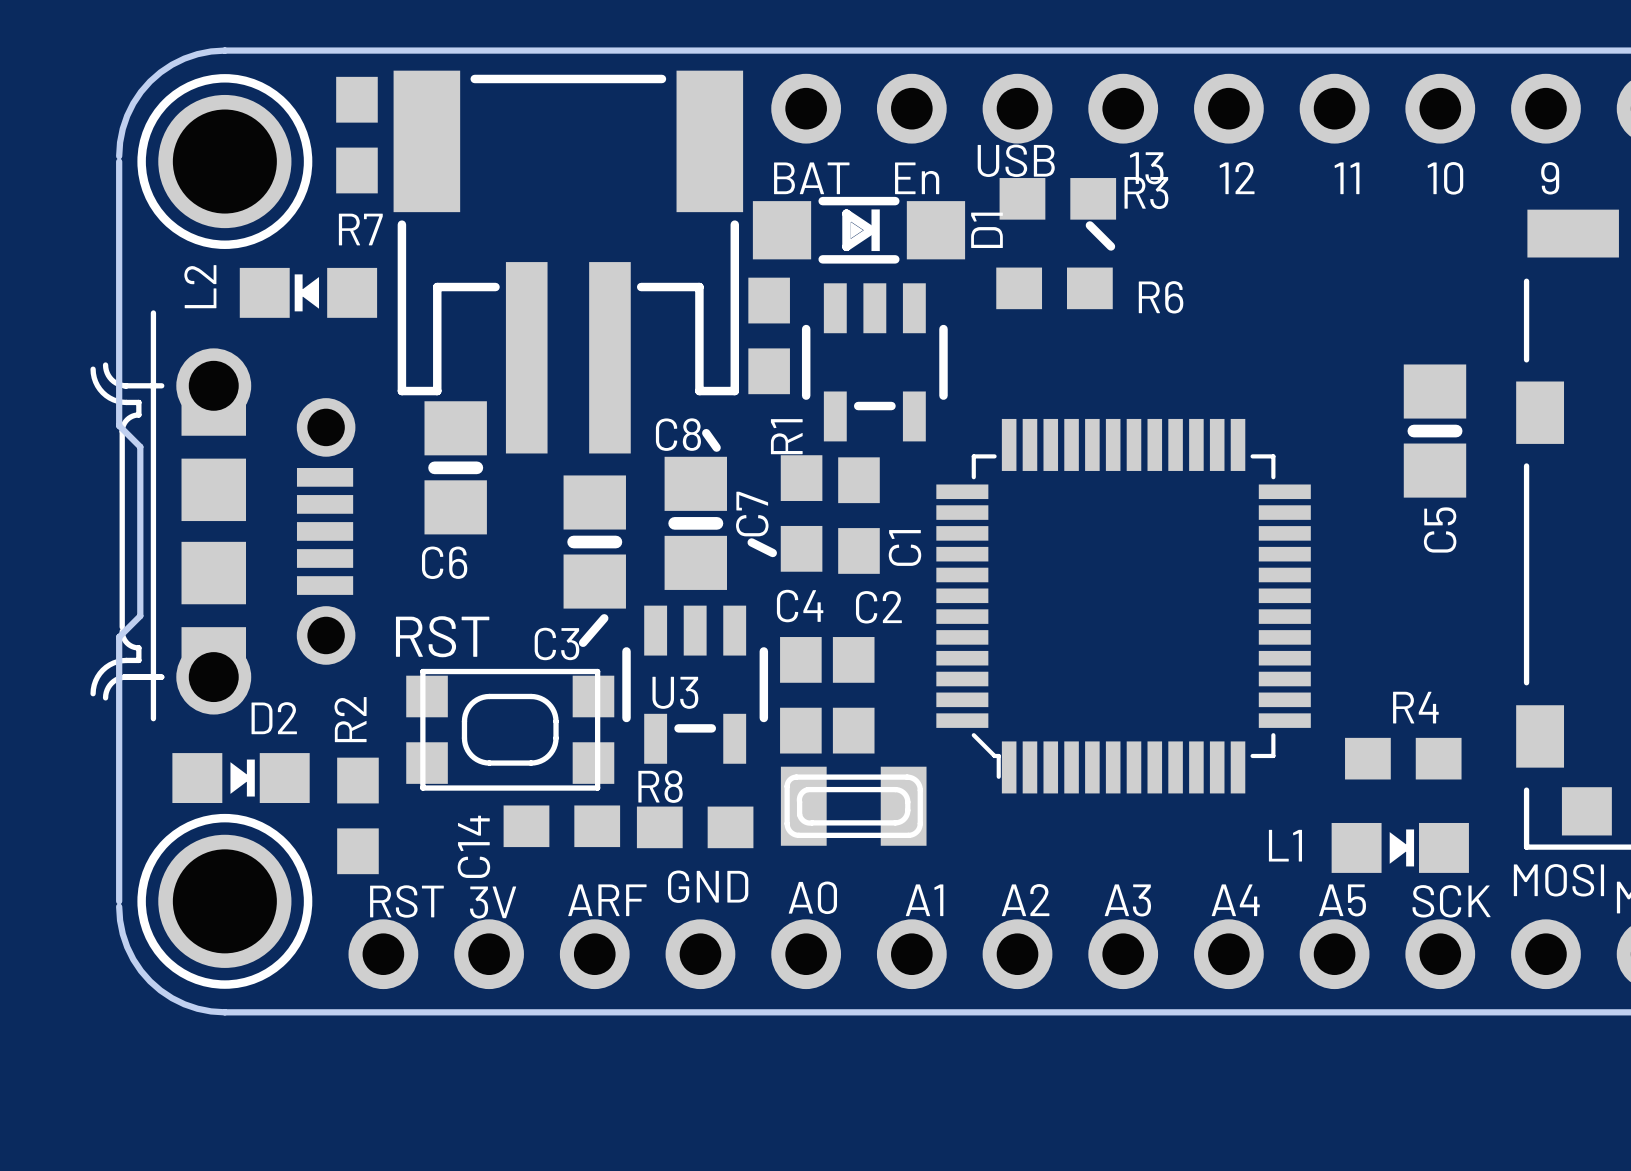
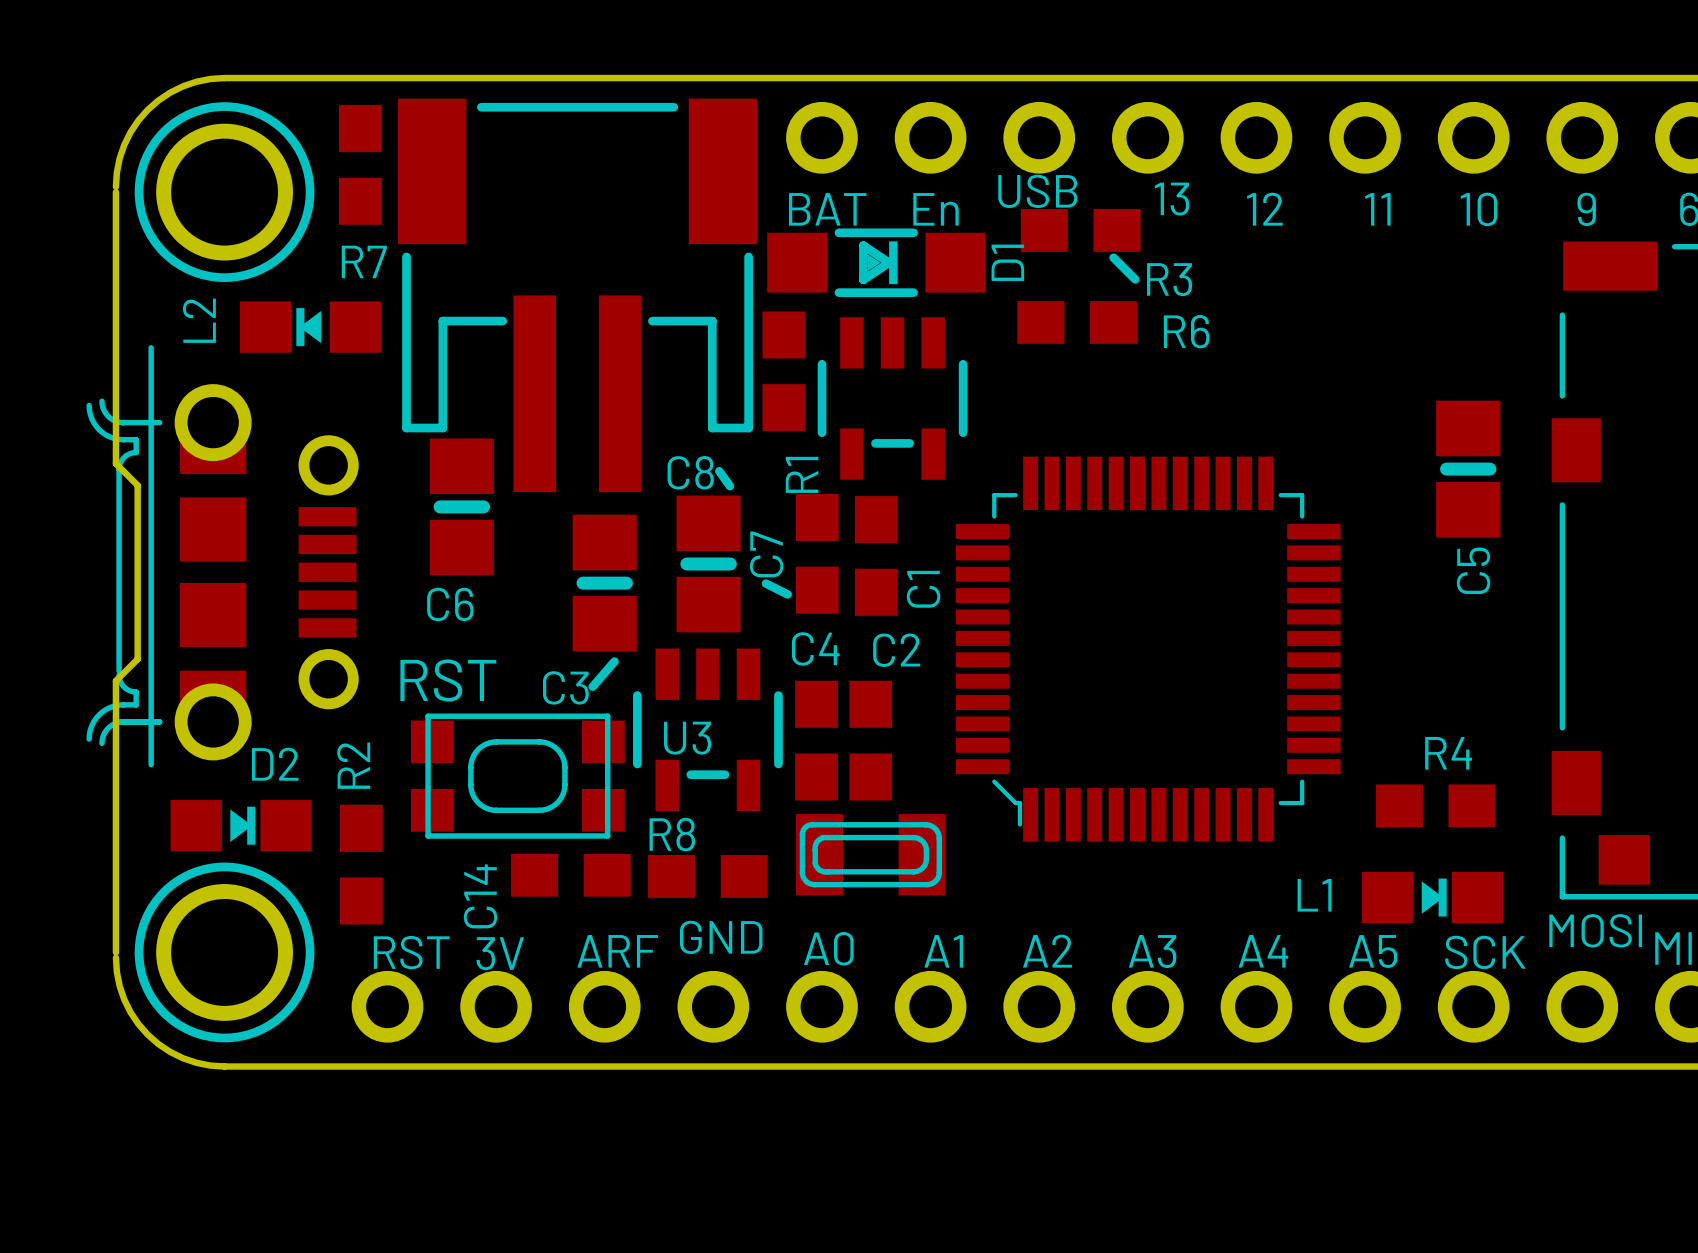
R3 name position: R3 (1146, 193) -> R3 (1169, 279)

